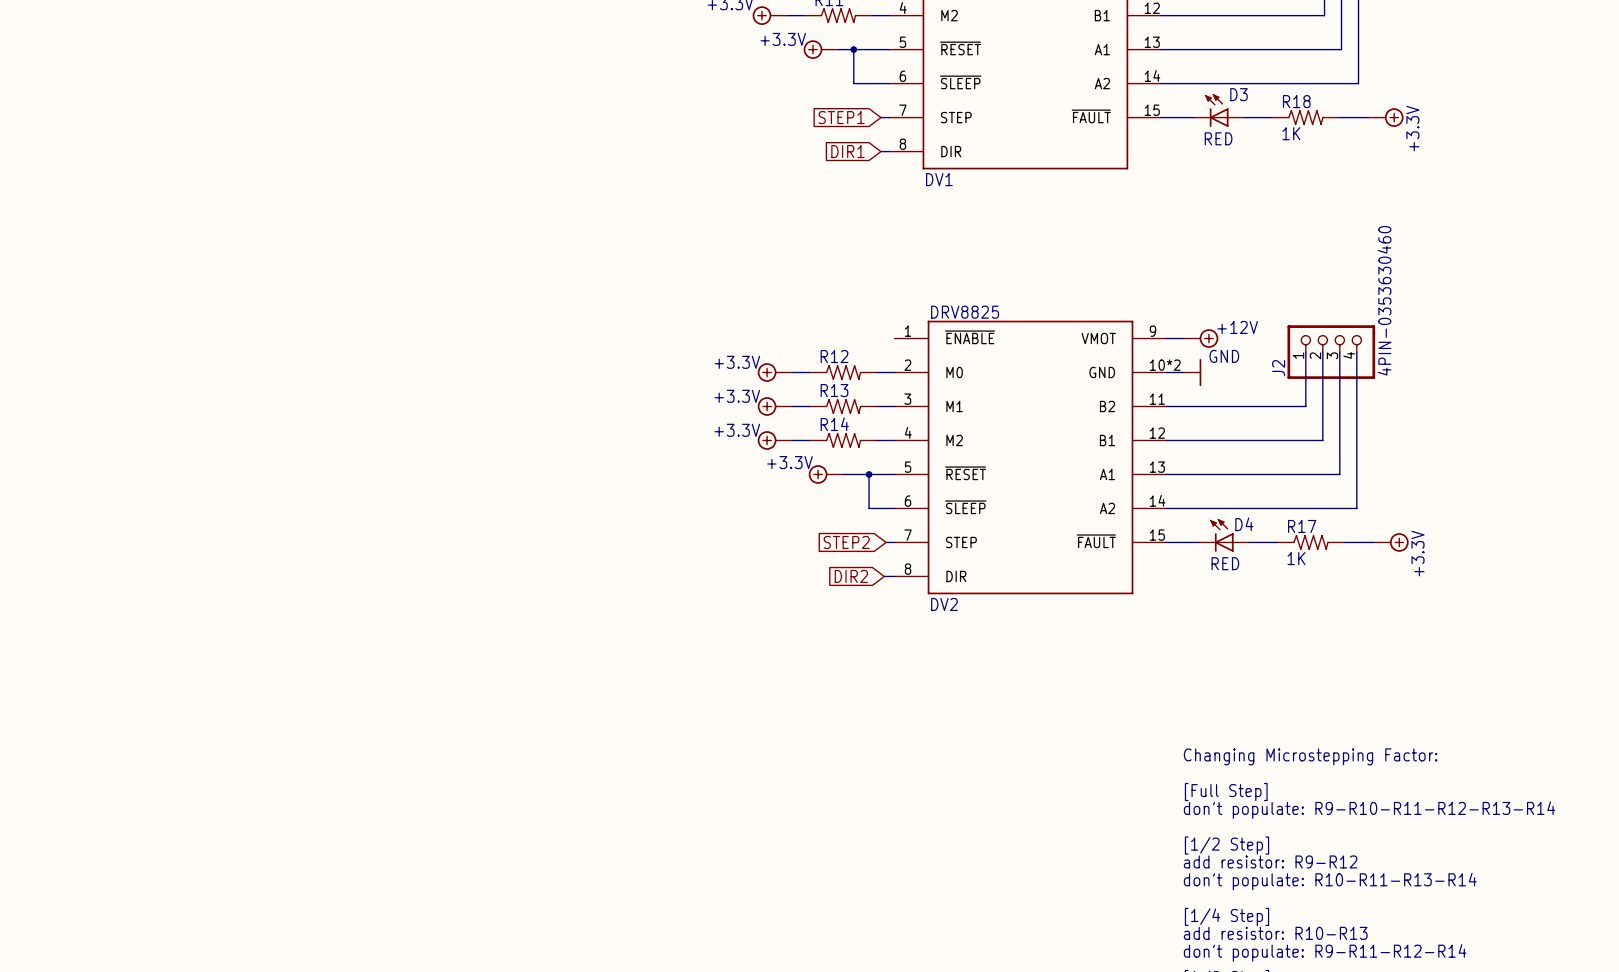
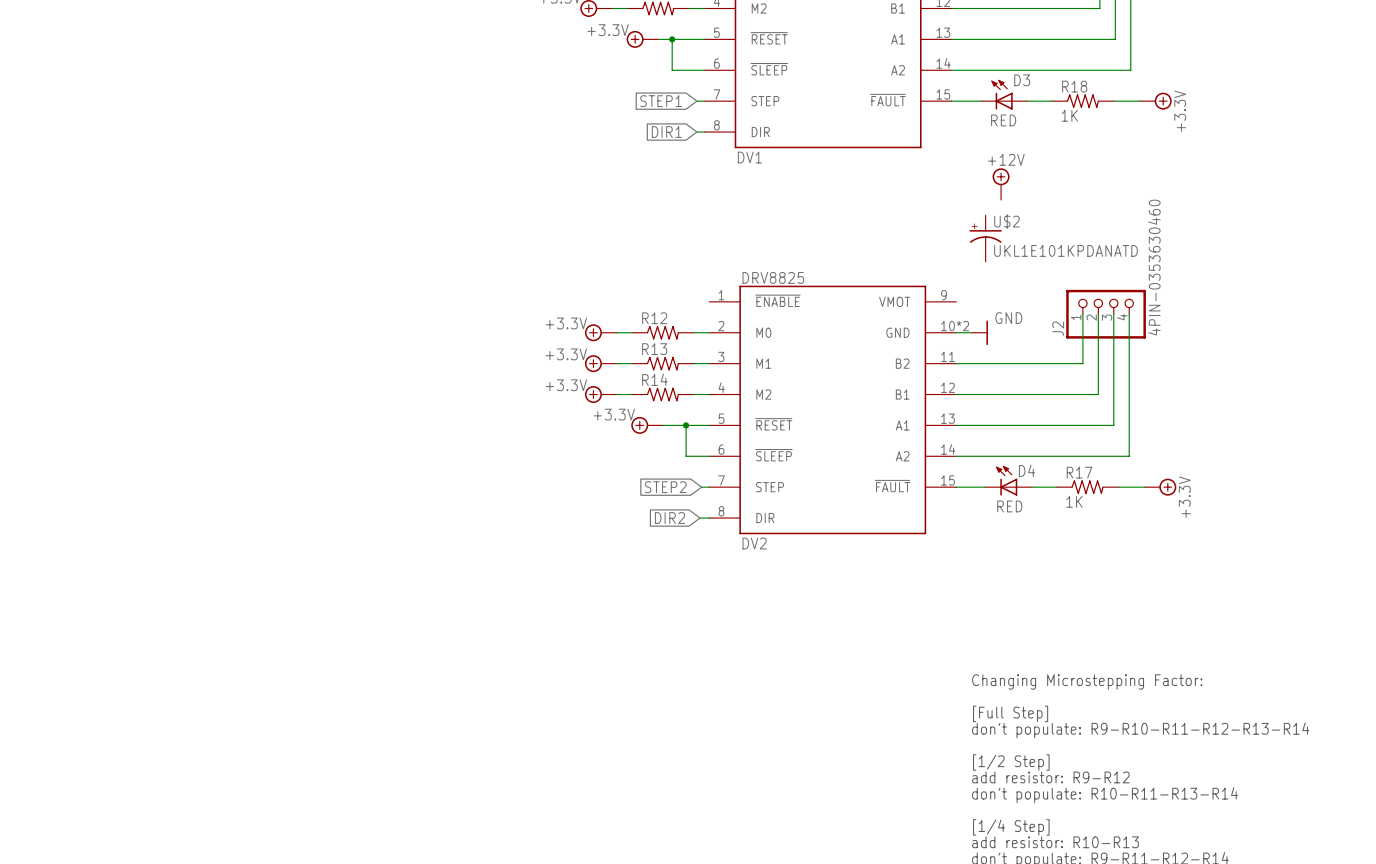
U$2: none -> UKL1E101KPDANATD (985, 238)
power symbol text position: +12V (1237, 327) -> +12V (1006, 159)
wire: (1166, 338) (1183, 338) -> none
power symbol position: +12V (1200, 338) -> +12V (1001, 184)
power symbol rotation: 0° (1208, 338) -> 90° counterclockwise (1001, 176)

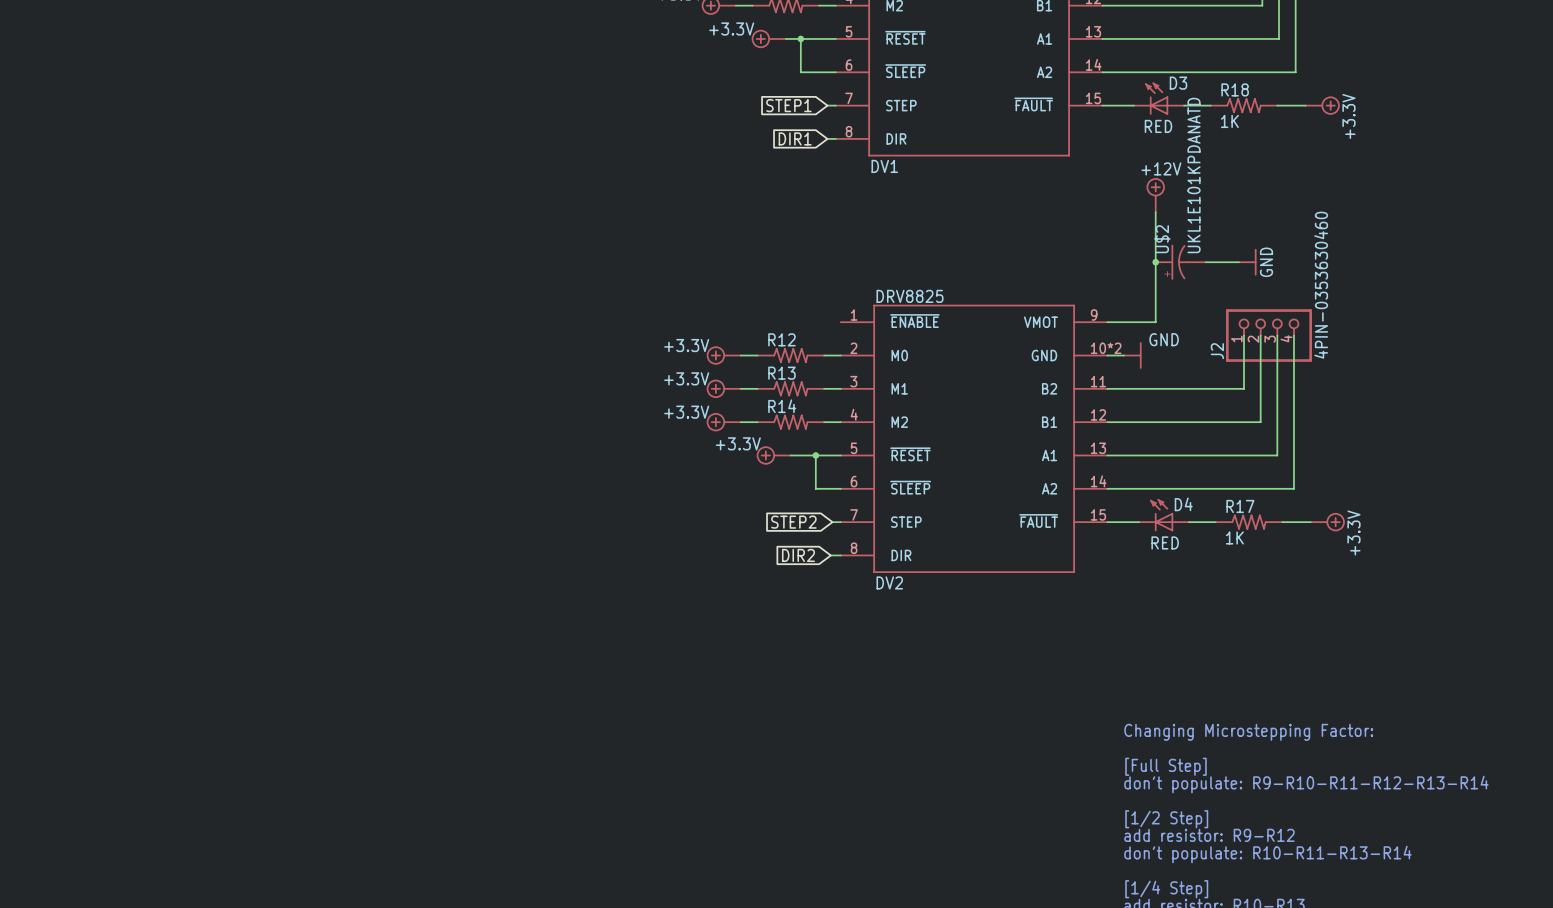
wire: none -> (1155, 212) (1155, 322) (1107, 322)
U$2 rotation: 0° (985, 235) -> 90° counterclockwise (1177, 262)
U$2 position: (985, 238) -> (1180, 262)
junction: none -> (1155, 262)
wire: none -> (1205, 262) (1239, 262)
power symbol: none -> GND (1247, 262)

